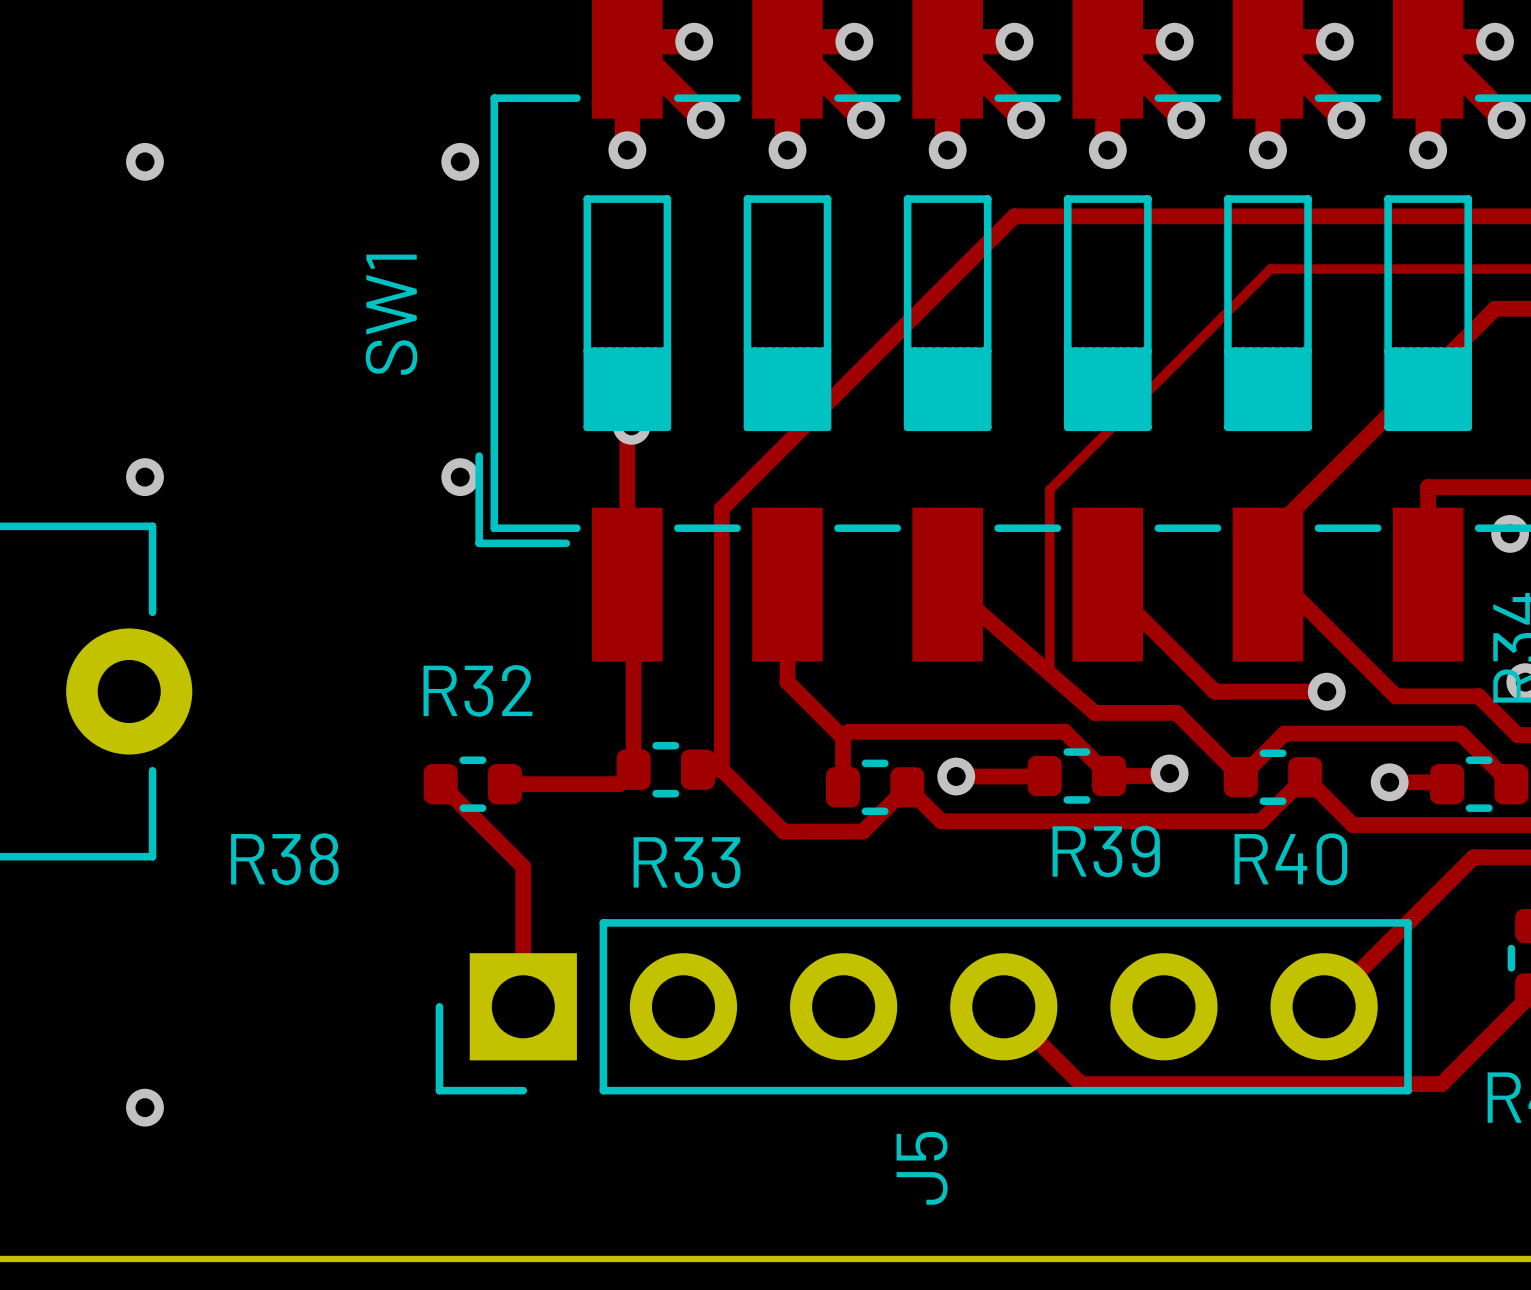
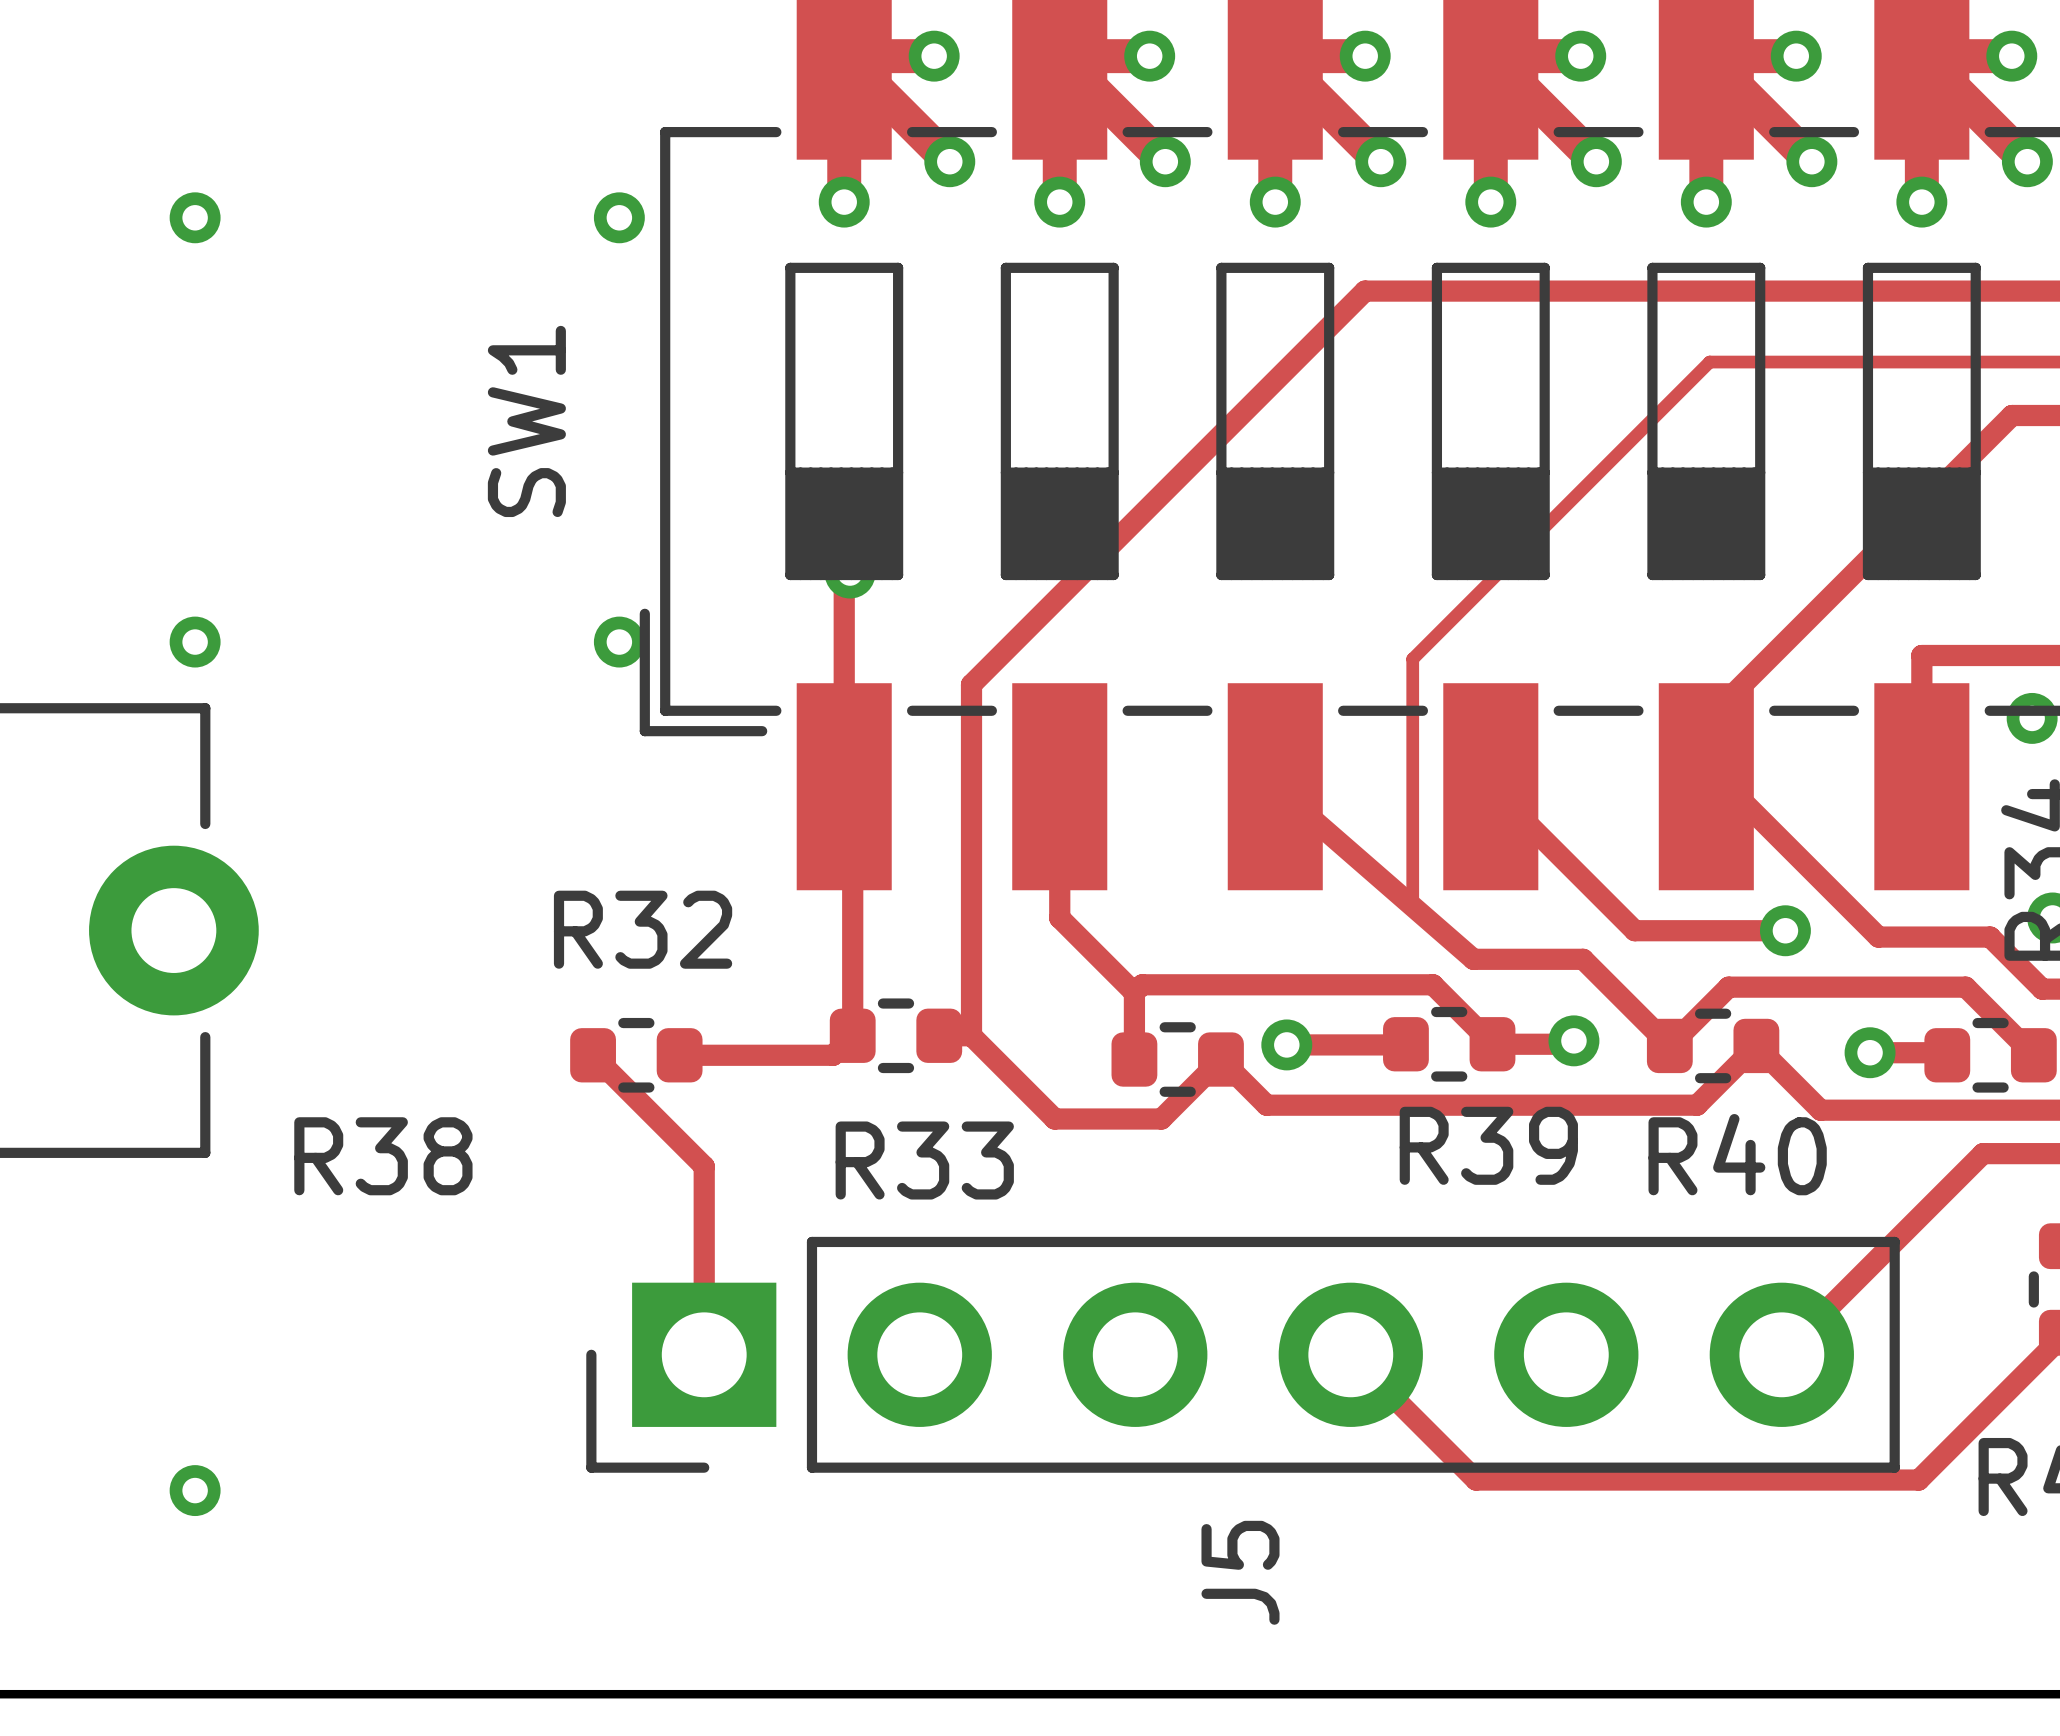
track: (1081, 1084) (1441, 1084) -> (1454, 1458) (1476, 1480) (1918, 1480) (1940, 1458)

